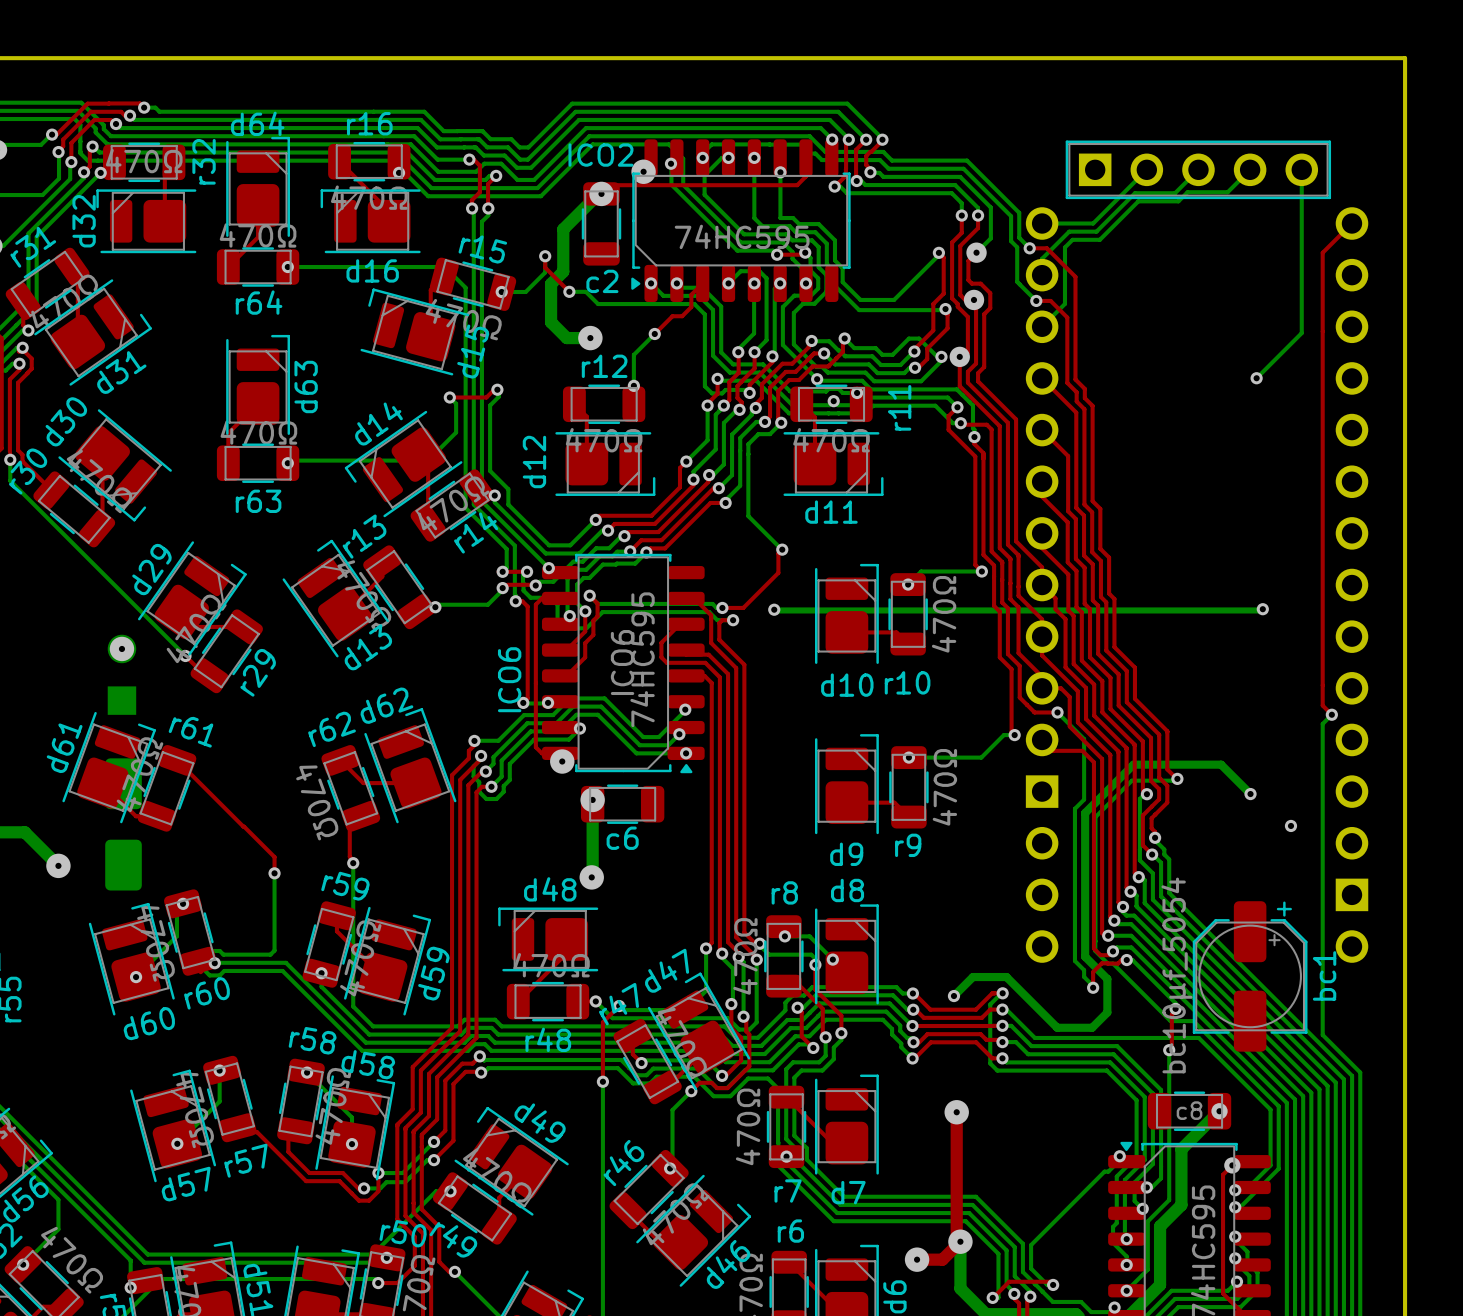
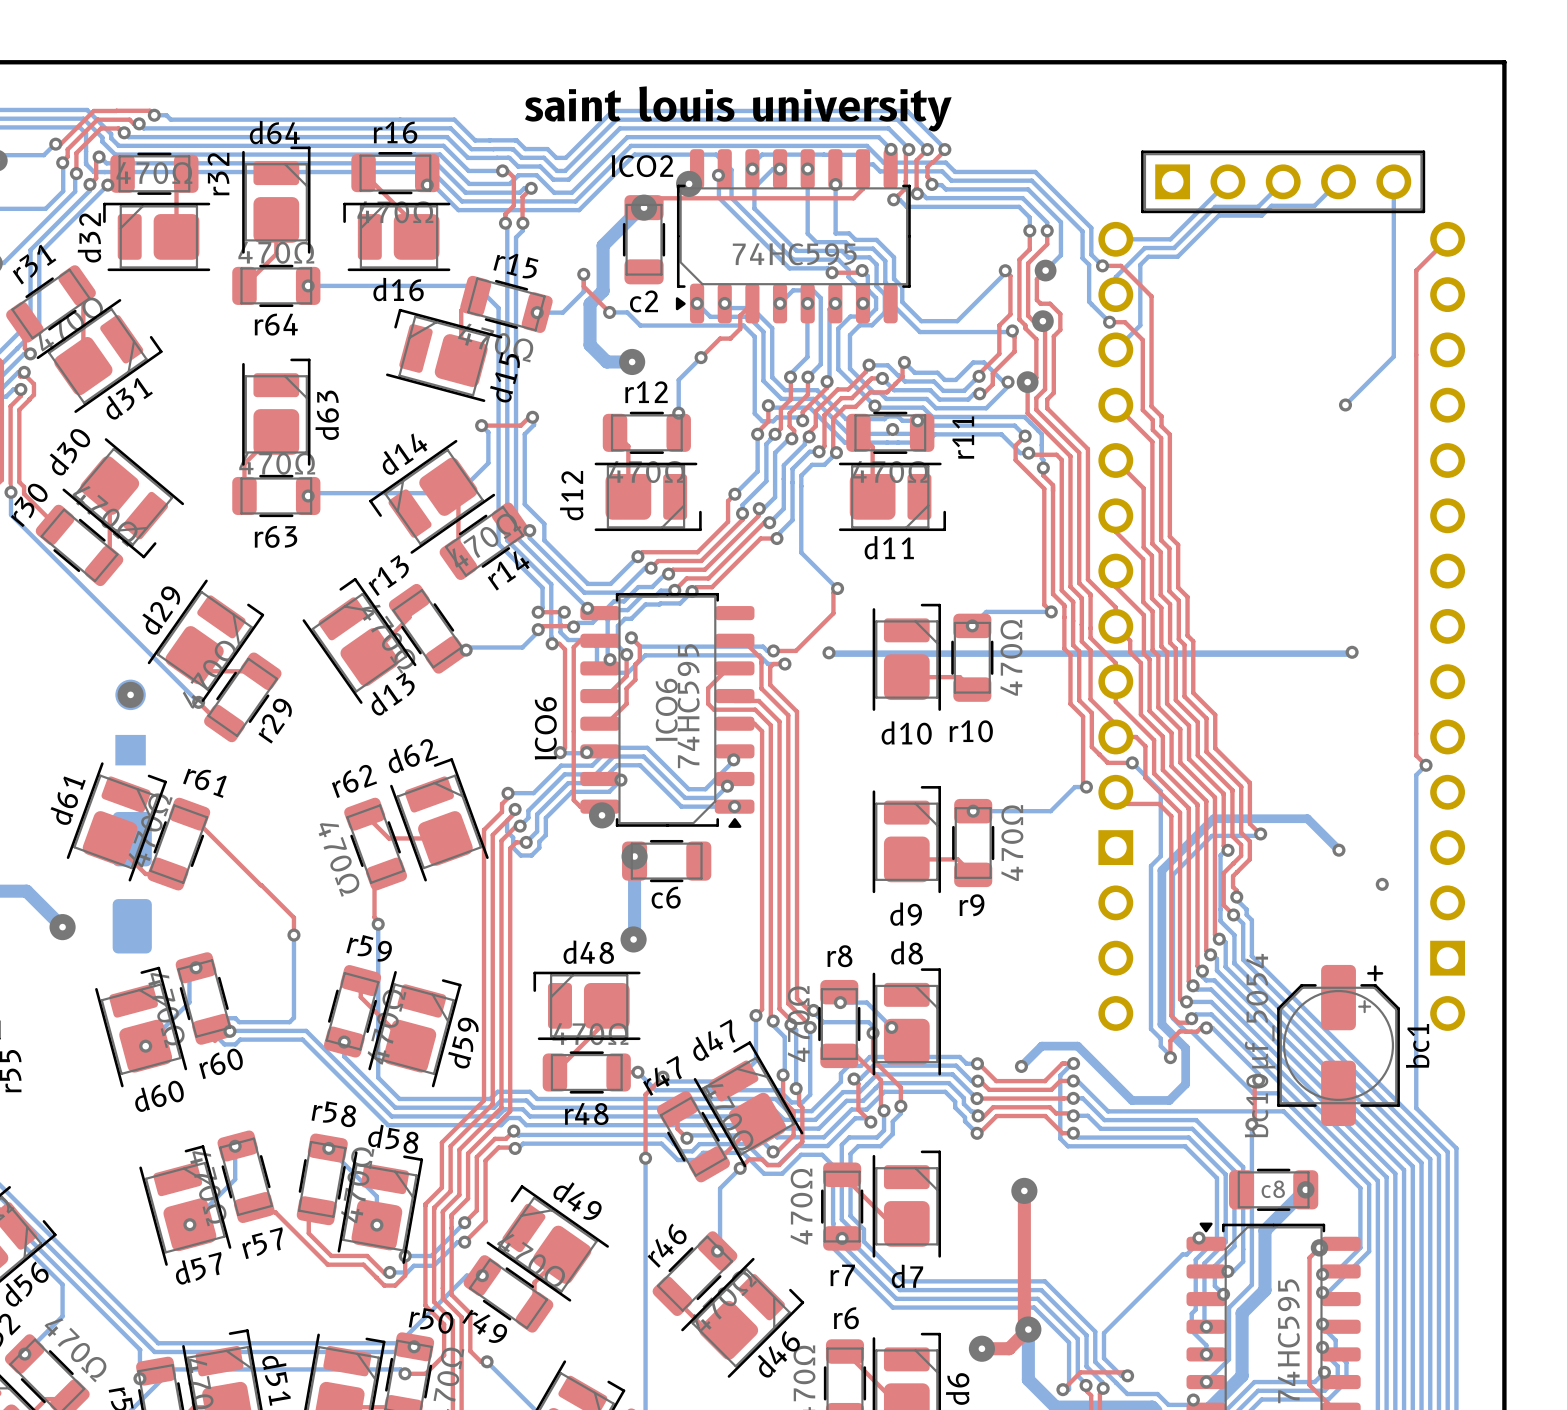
text: none -> saint louis university (738, 108)

